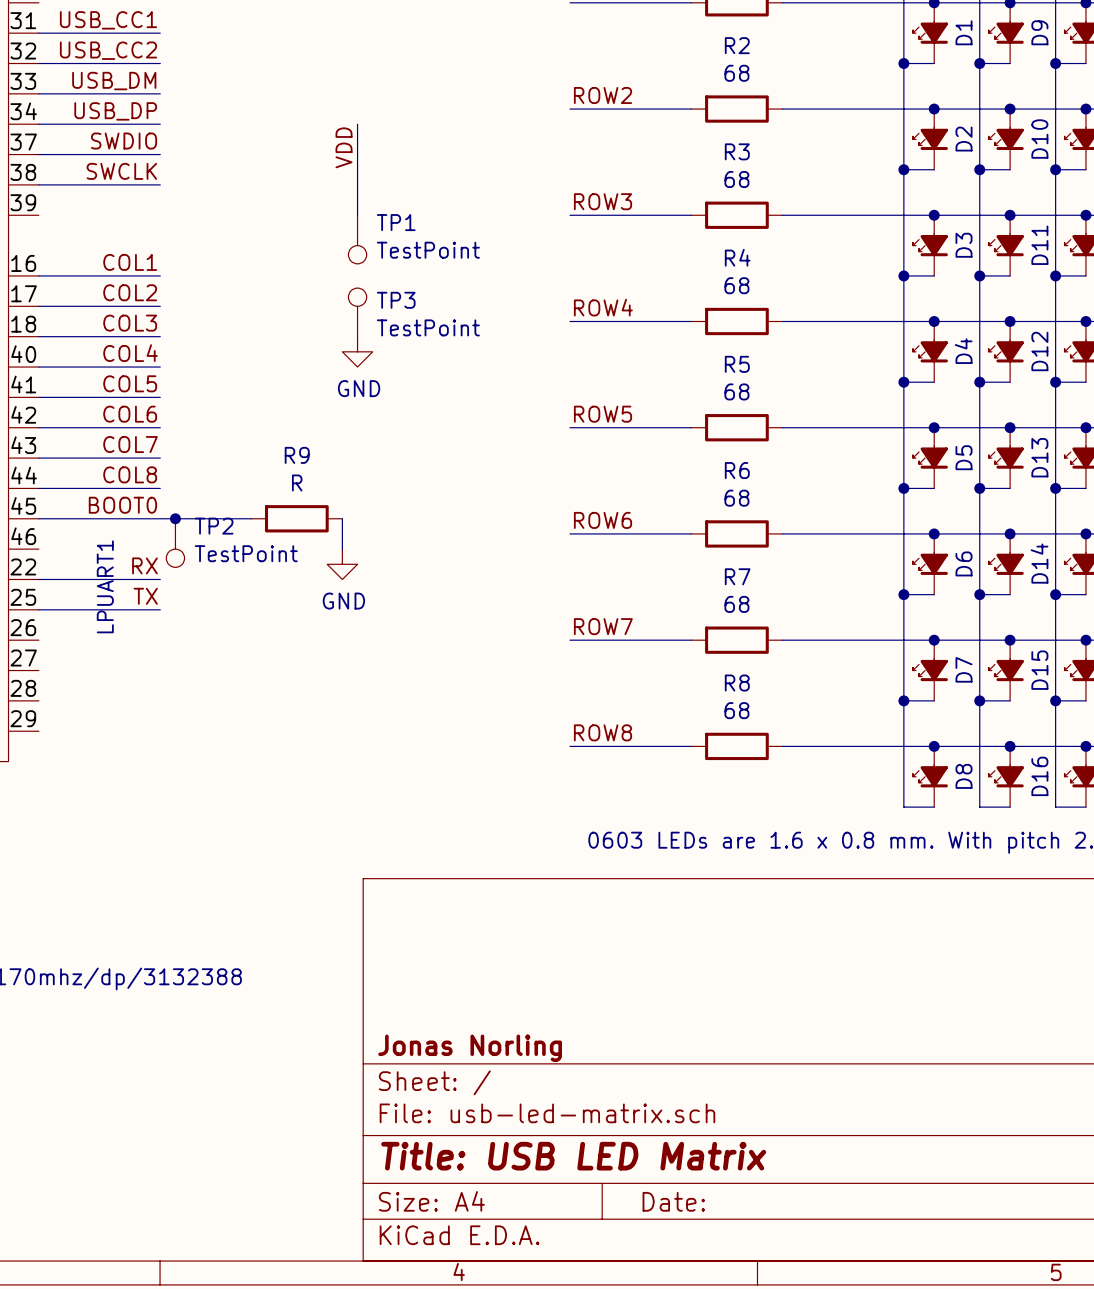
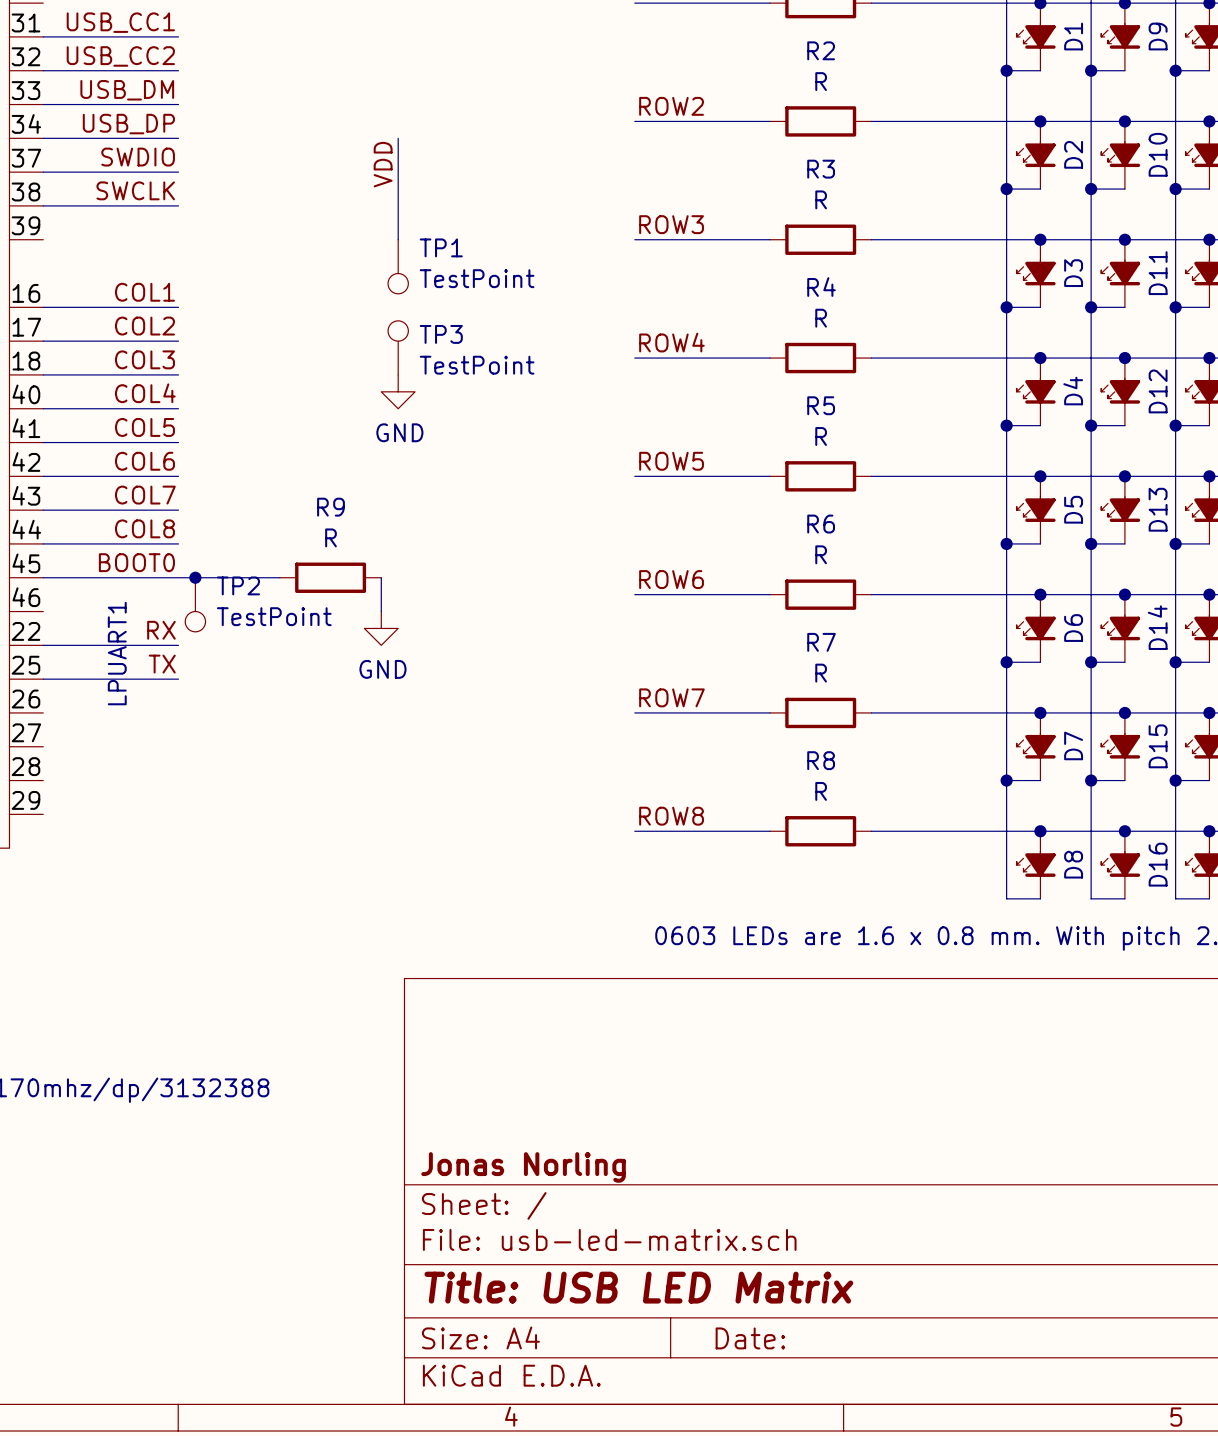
R2 value: 68 (736, 73) -> R (821, 81)
R3 value: 68 (736, 179) -> R (821, 199)
R4 value: 68 (736, 285) -> R (821, 318)
R5 value: 68 (736, 391) -> R (821, 436)
R6 value: 68 (736, 498) -> R (821, 554)
R7 value: 68 (736, 604) -> R (821, 673)
R8 value: 68 (736, 710) -> R (821, 791)

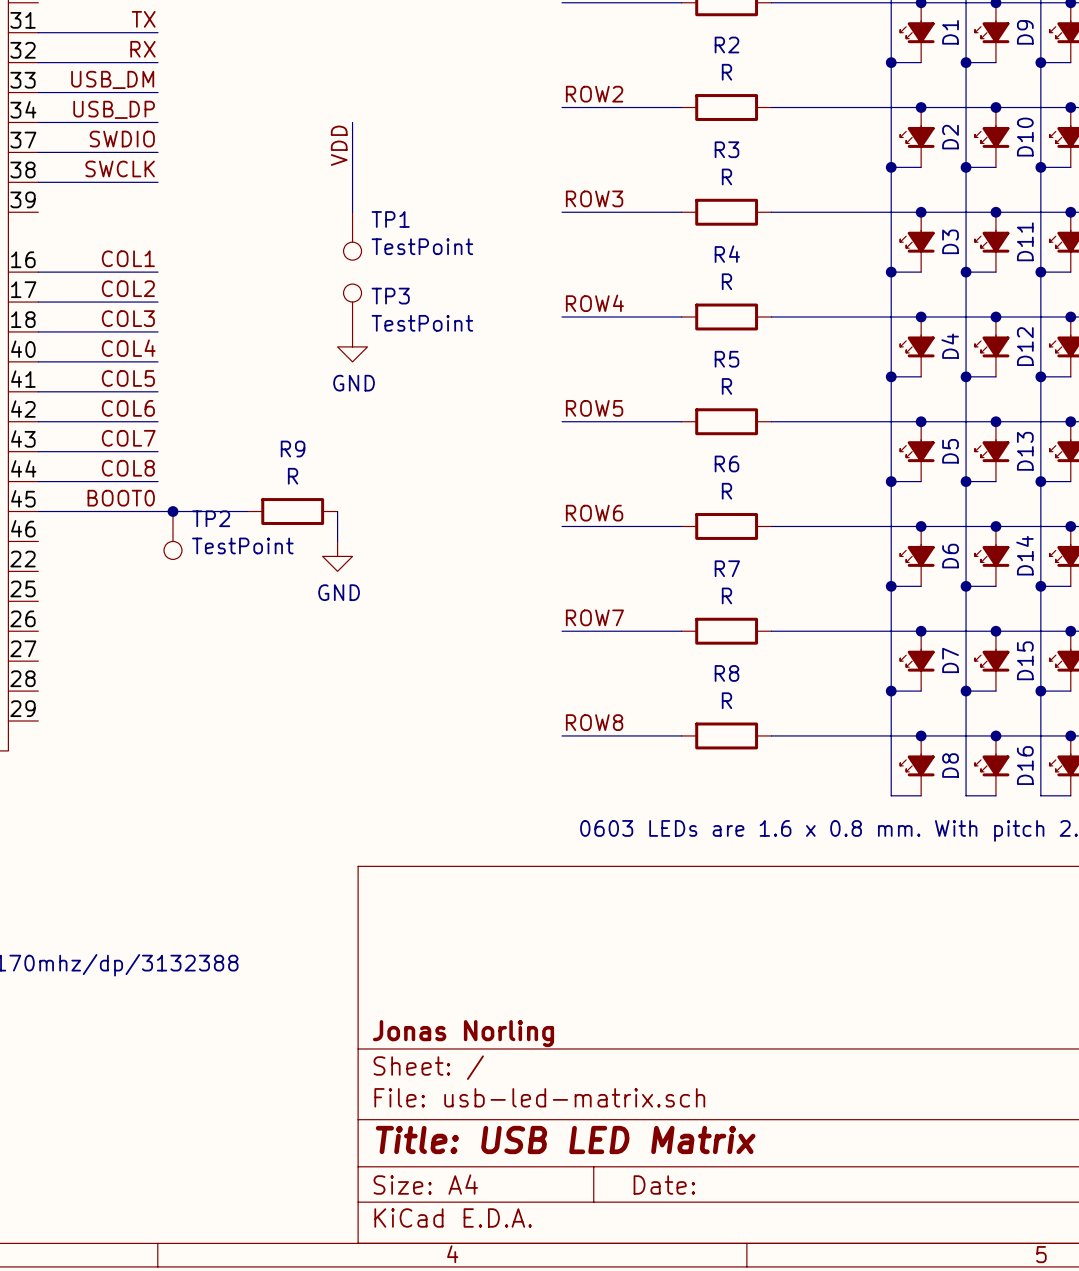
label: USB_CC1 (120, 22) -> TX (143, 19)
label: USB_CC2 (120, 56) -> RX (142, 49)
label: RX (161, 630) -> none
wire: (43, 645) (178, 645) -> none
text: LPUART1 (117, 653) -> none
label: TX (162, 664) -> none
wire: (43, 679) (178, 679) -> none

